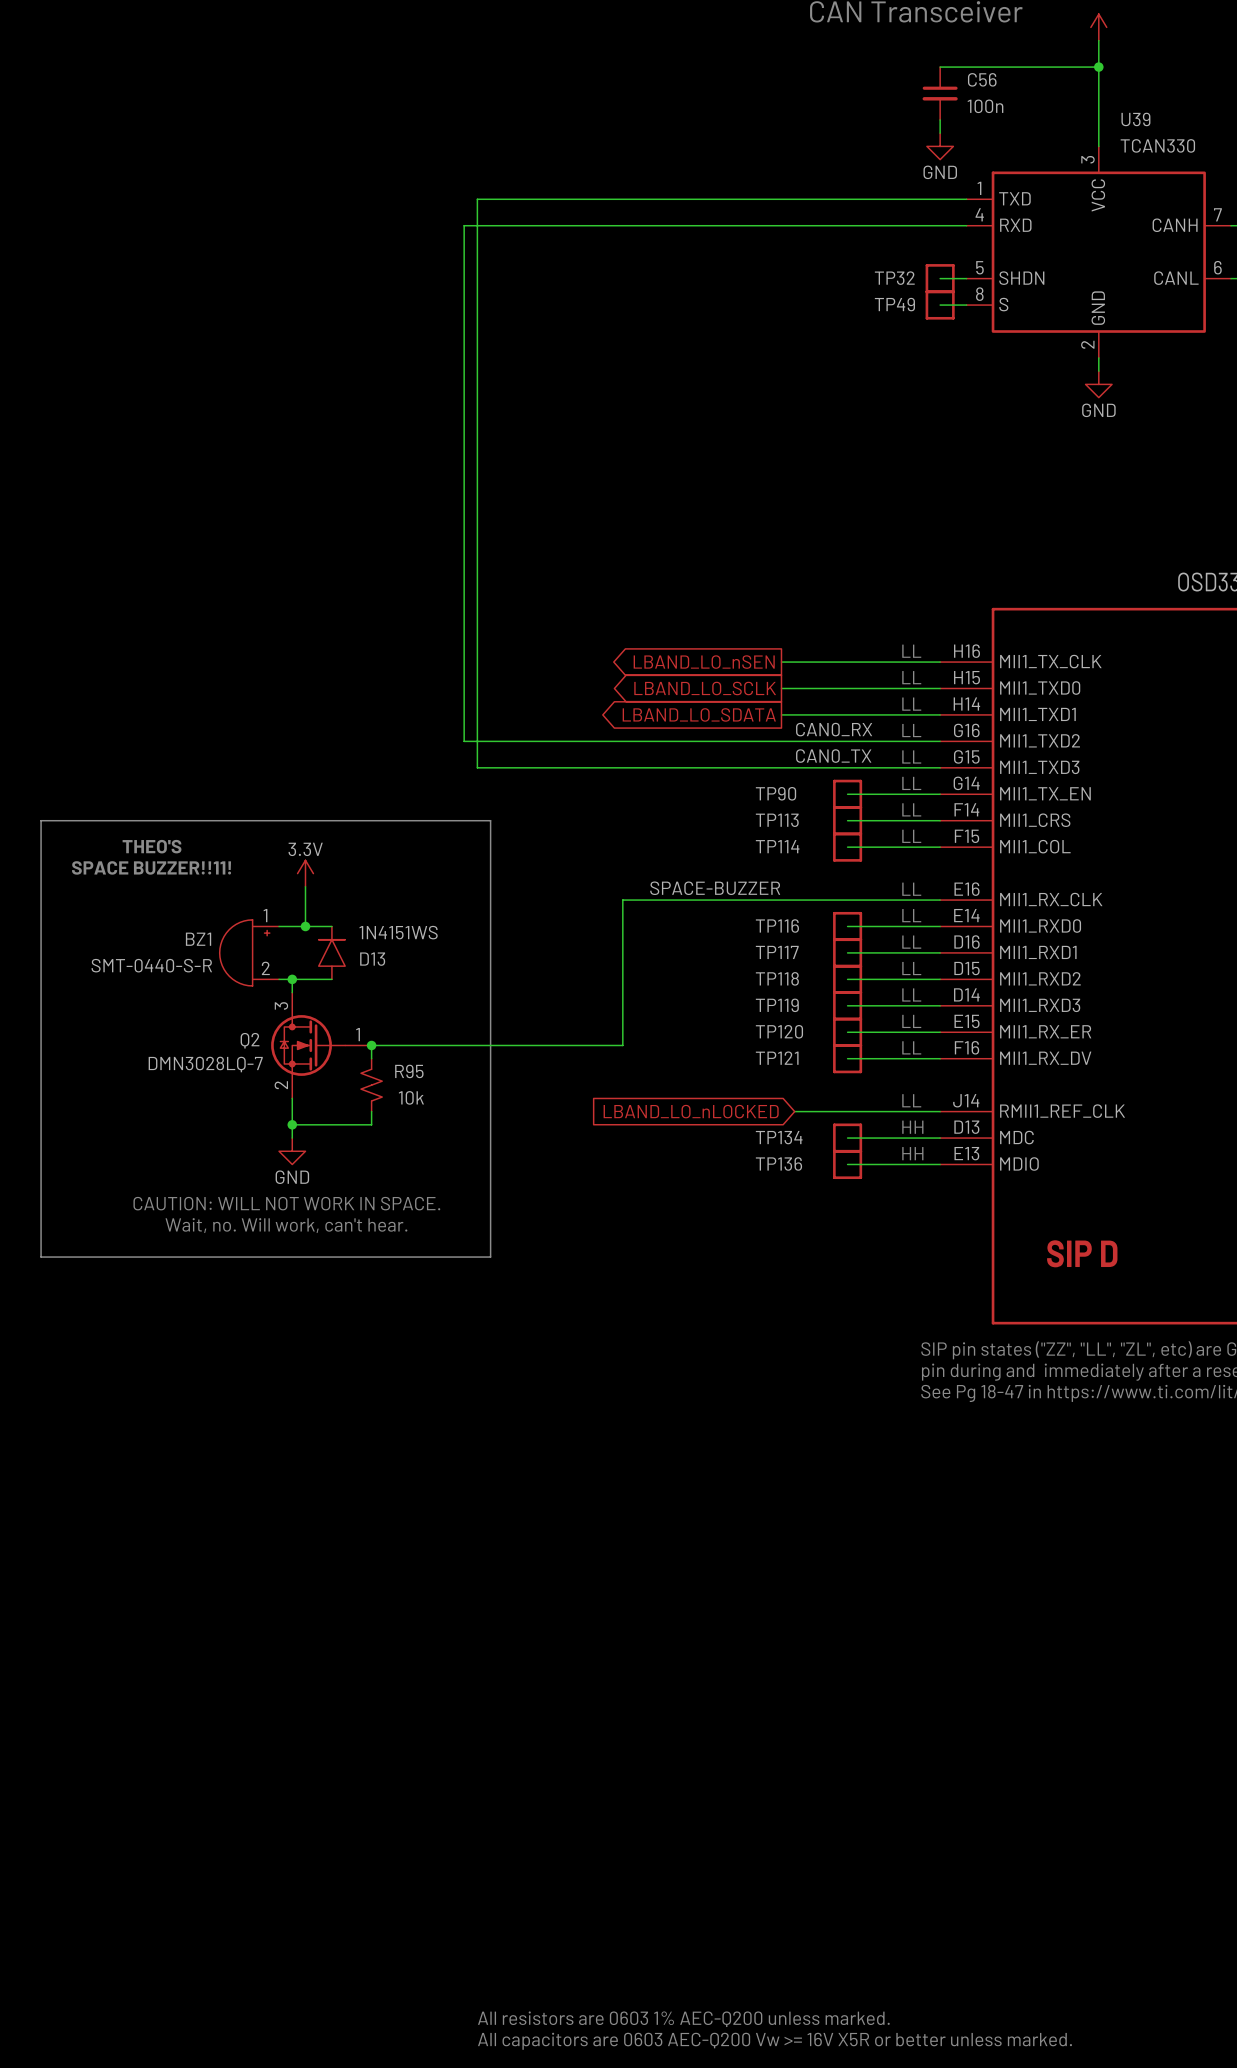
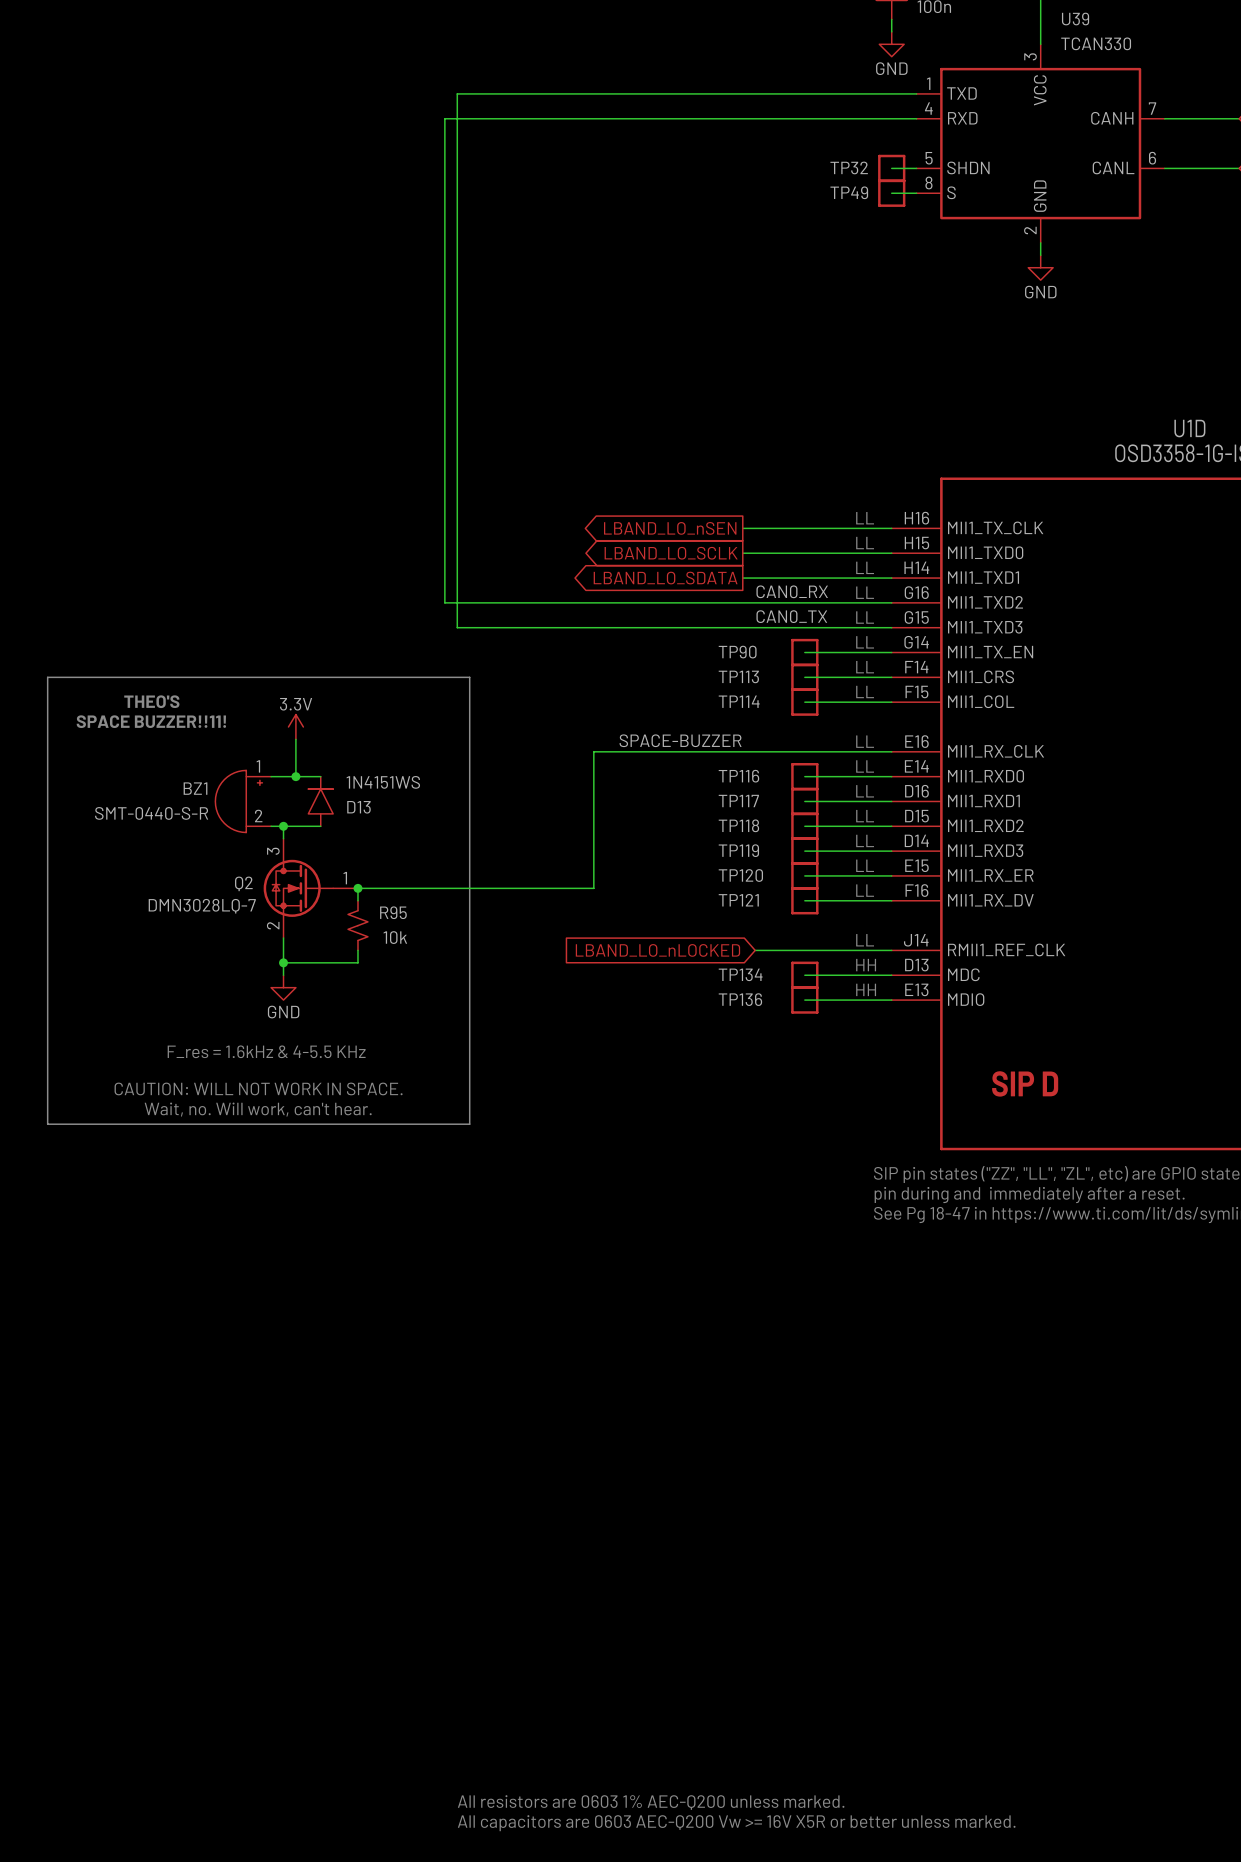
text position: CAUTION: WILL NOT WORK IN SPACE. (286, 1203) -> CAUTION: WILL NOT WORK IN SPACE. (258, 1088)
text: none -> F_res = 1.6kHz & 4-5.5 KHz (266, 1051)
text position: Wait, no. Will work, can't hear. (286, 1225) -> Wait, no. Will work, can't hear. (258, 1109)
line: (41, 1257) (490, 1257) -> (47, 1086) (47, 1124) (469, 1124) (469, 1086)

